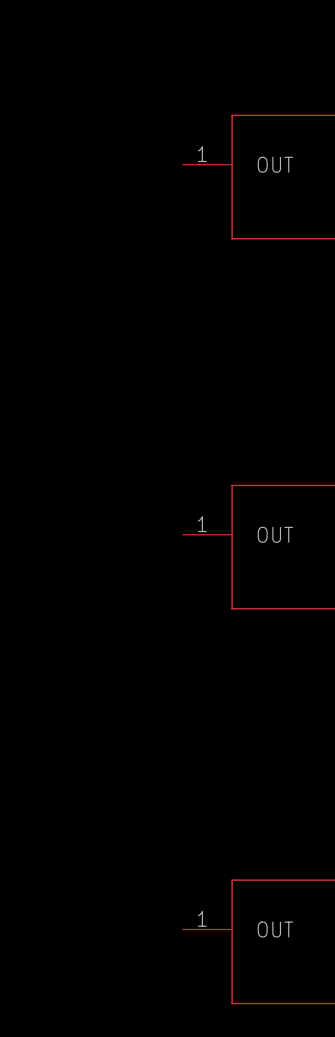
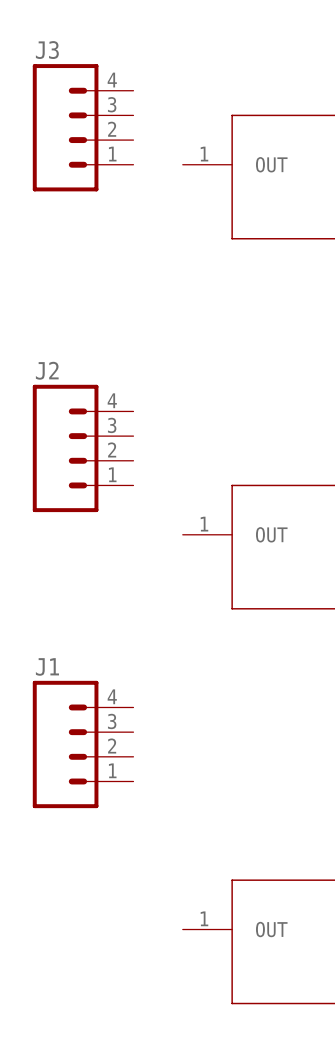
J3: none -> (83, 127)
J2: none -> (83, 448)
J1: none -> (83, 744)

